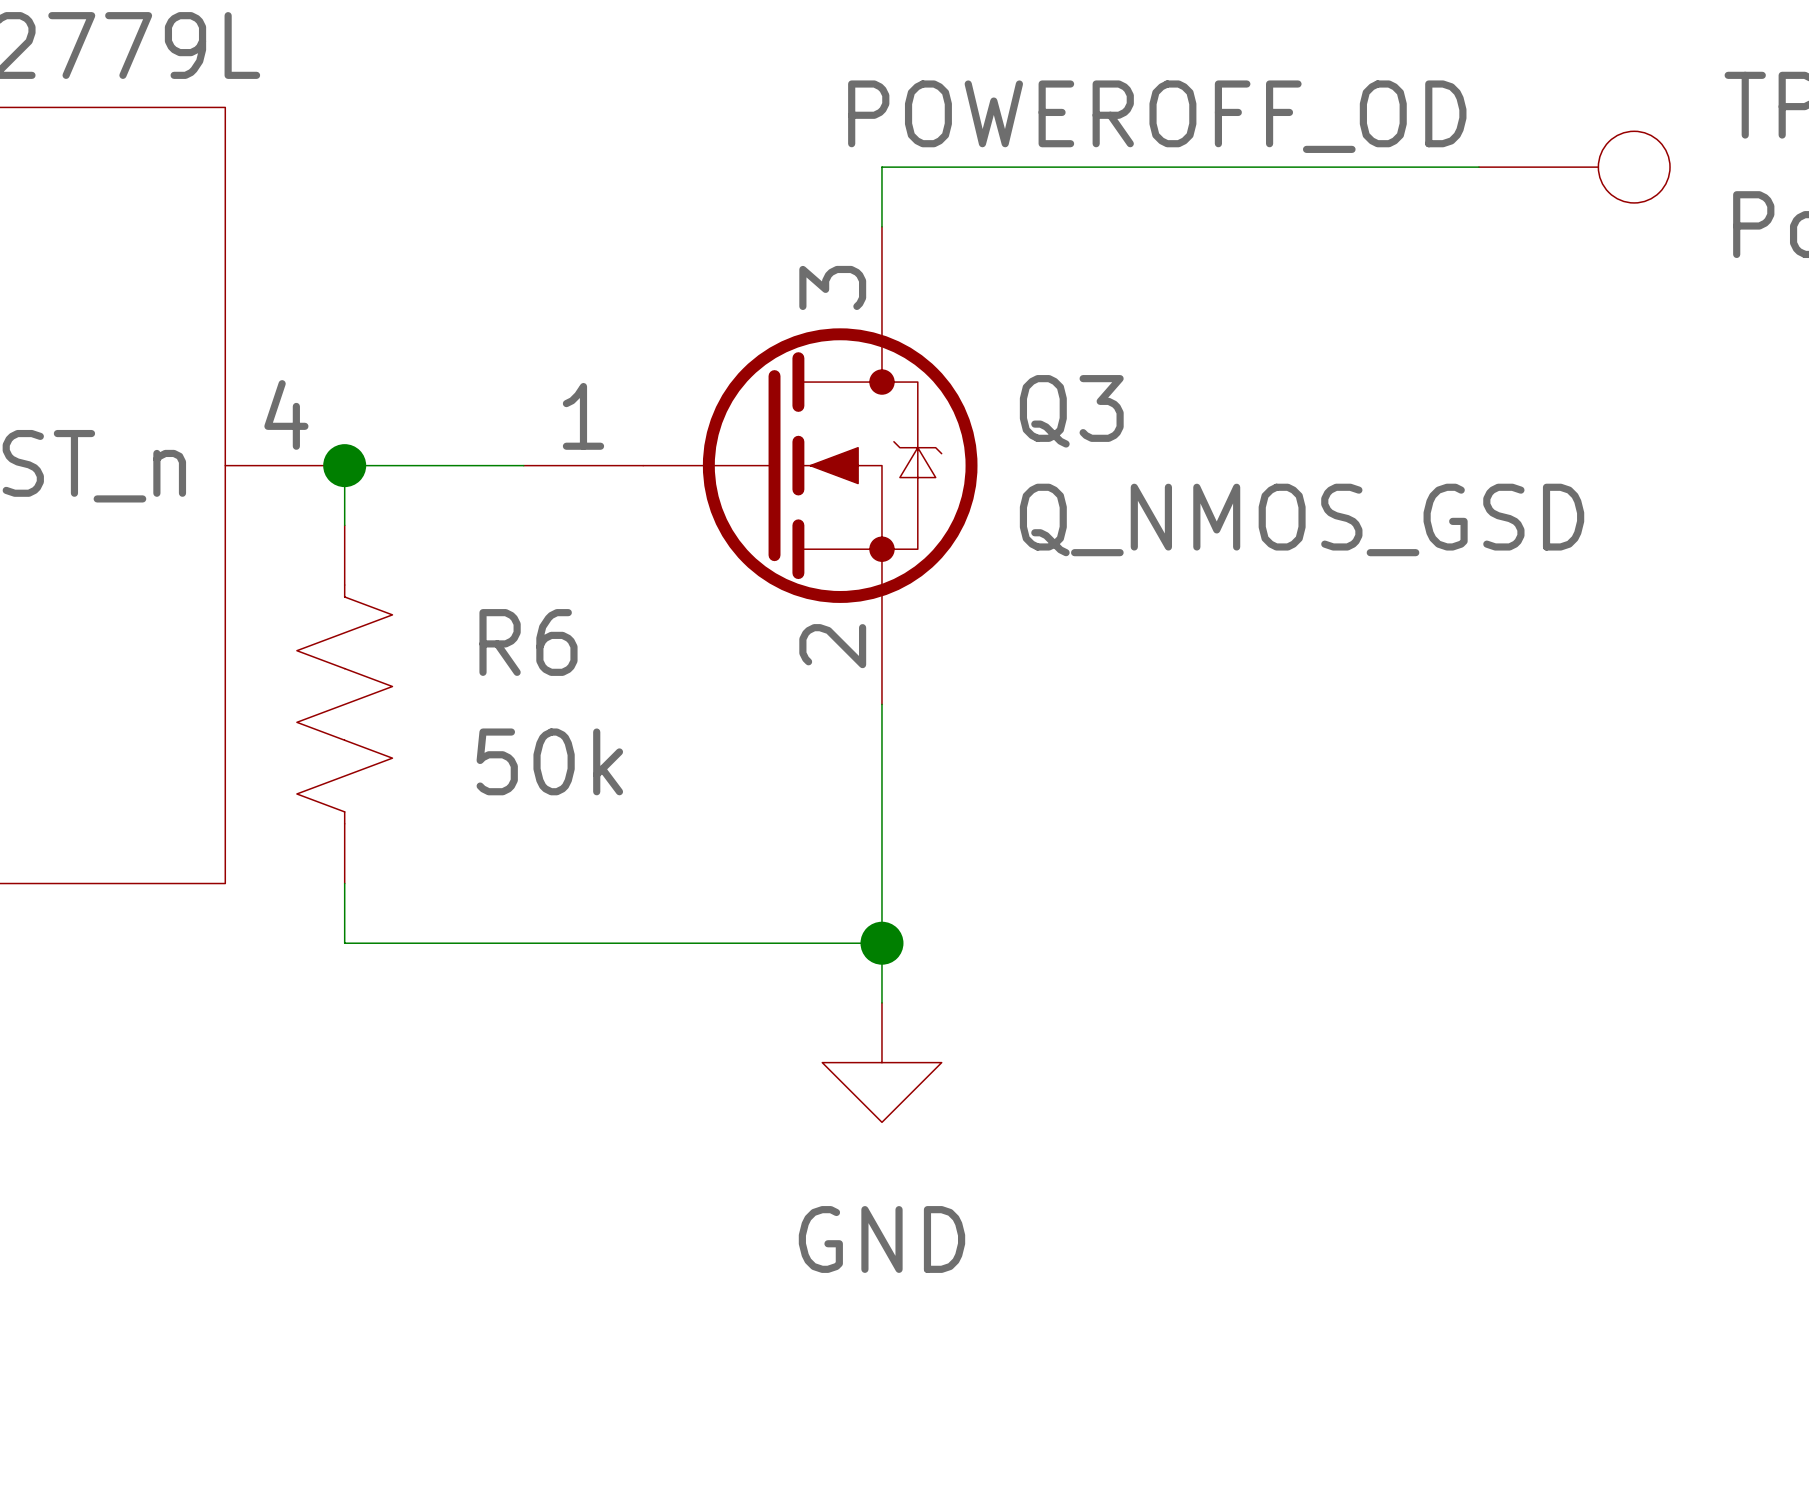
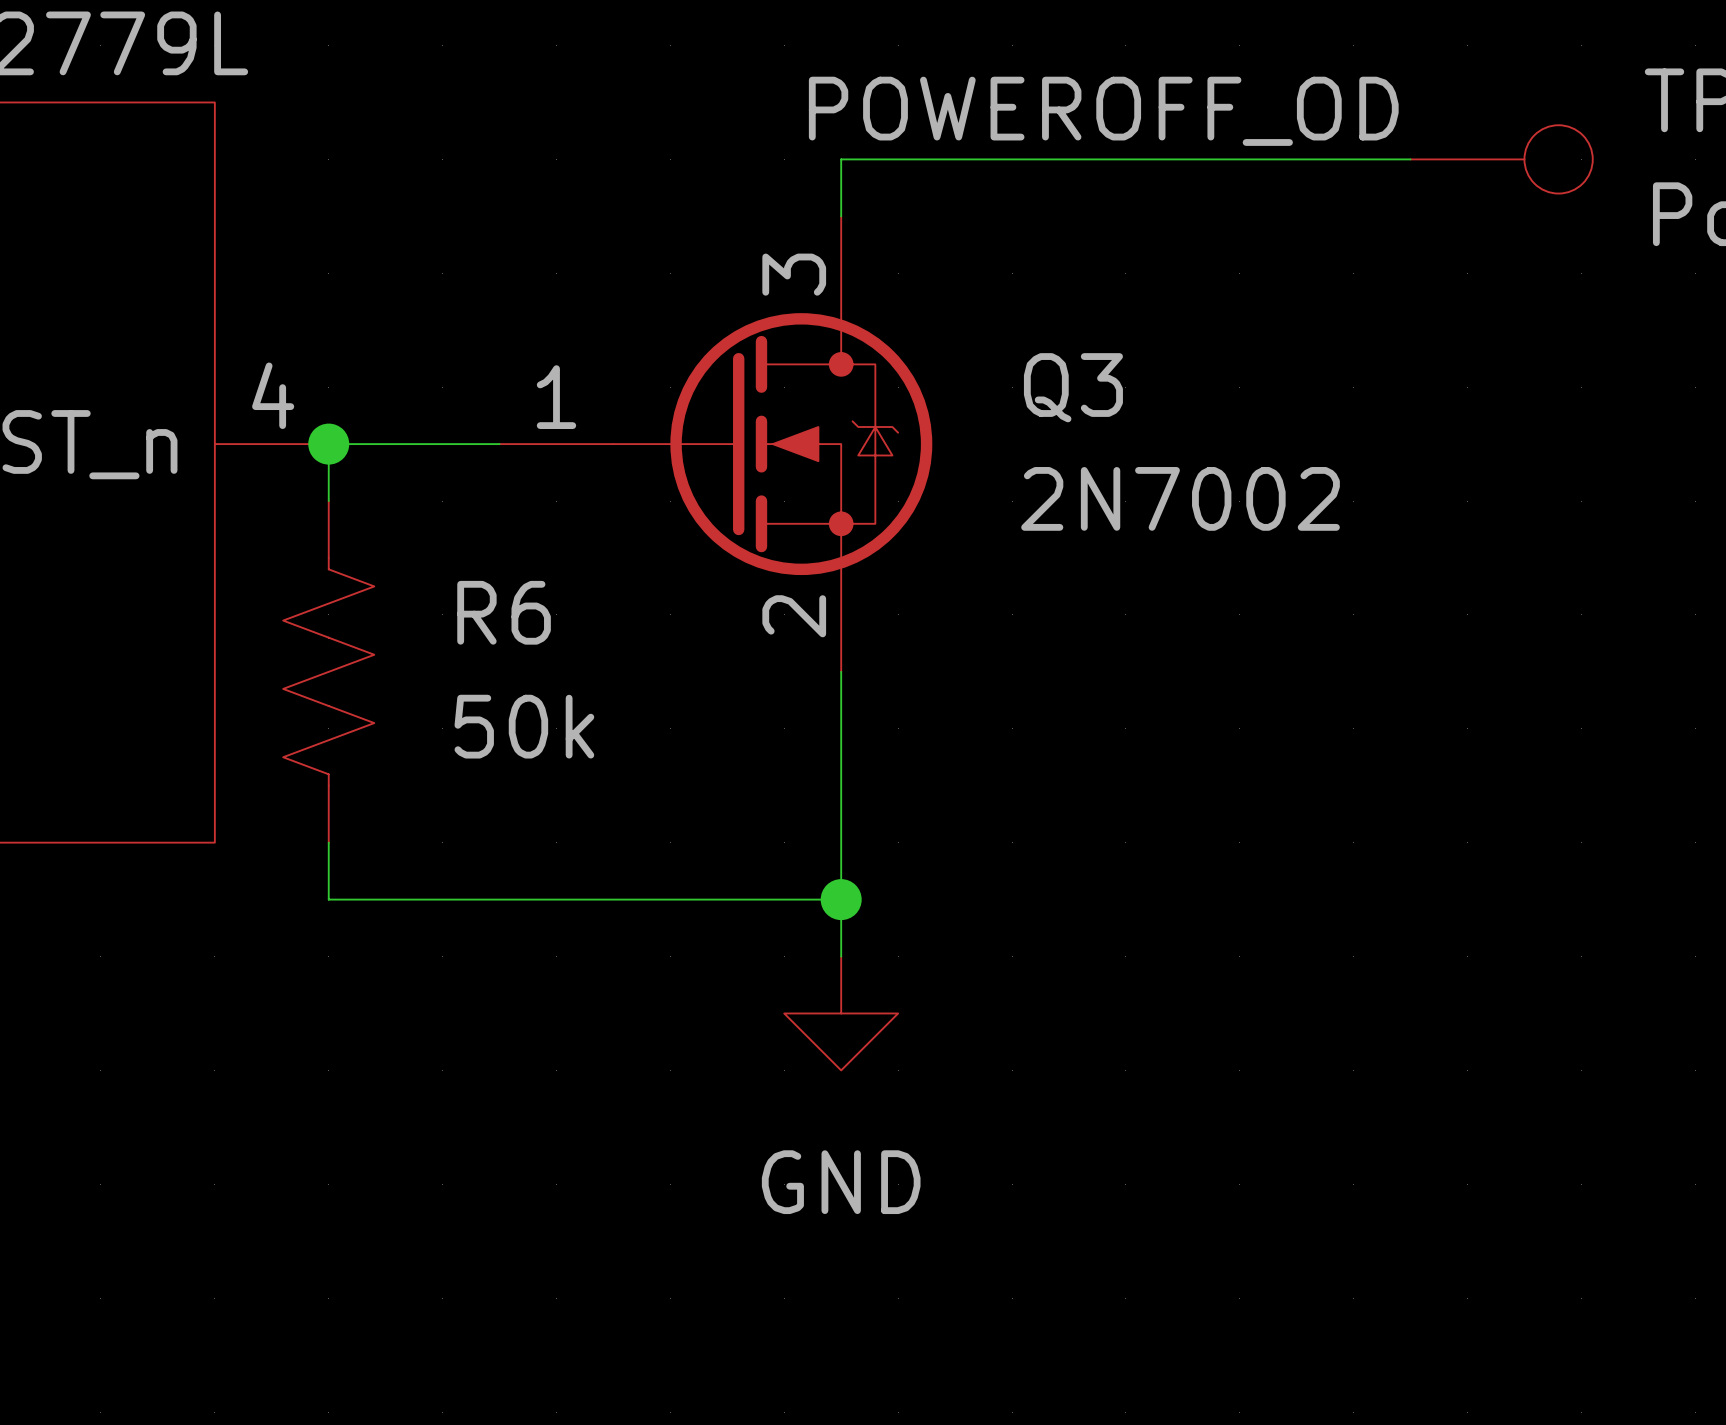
Q3 name position: Q3 (1071, 411) -> Q3 (1073, 387)
Q3 value: Q_NMOS_GSD (1302, 519) -> 2N7002 (1180, 498)

